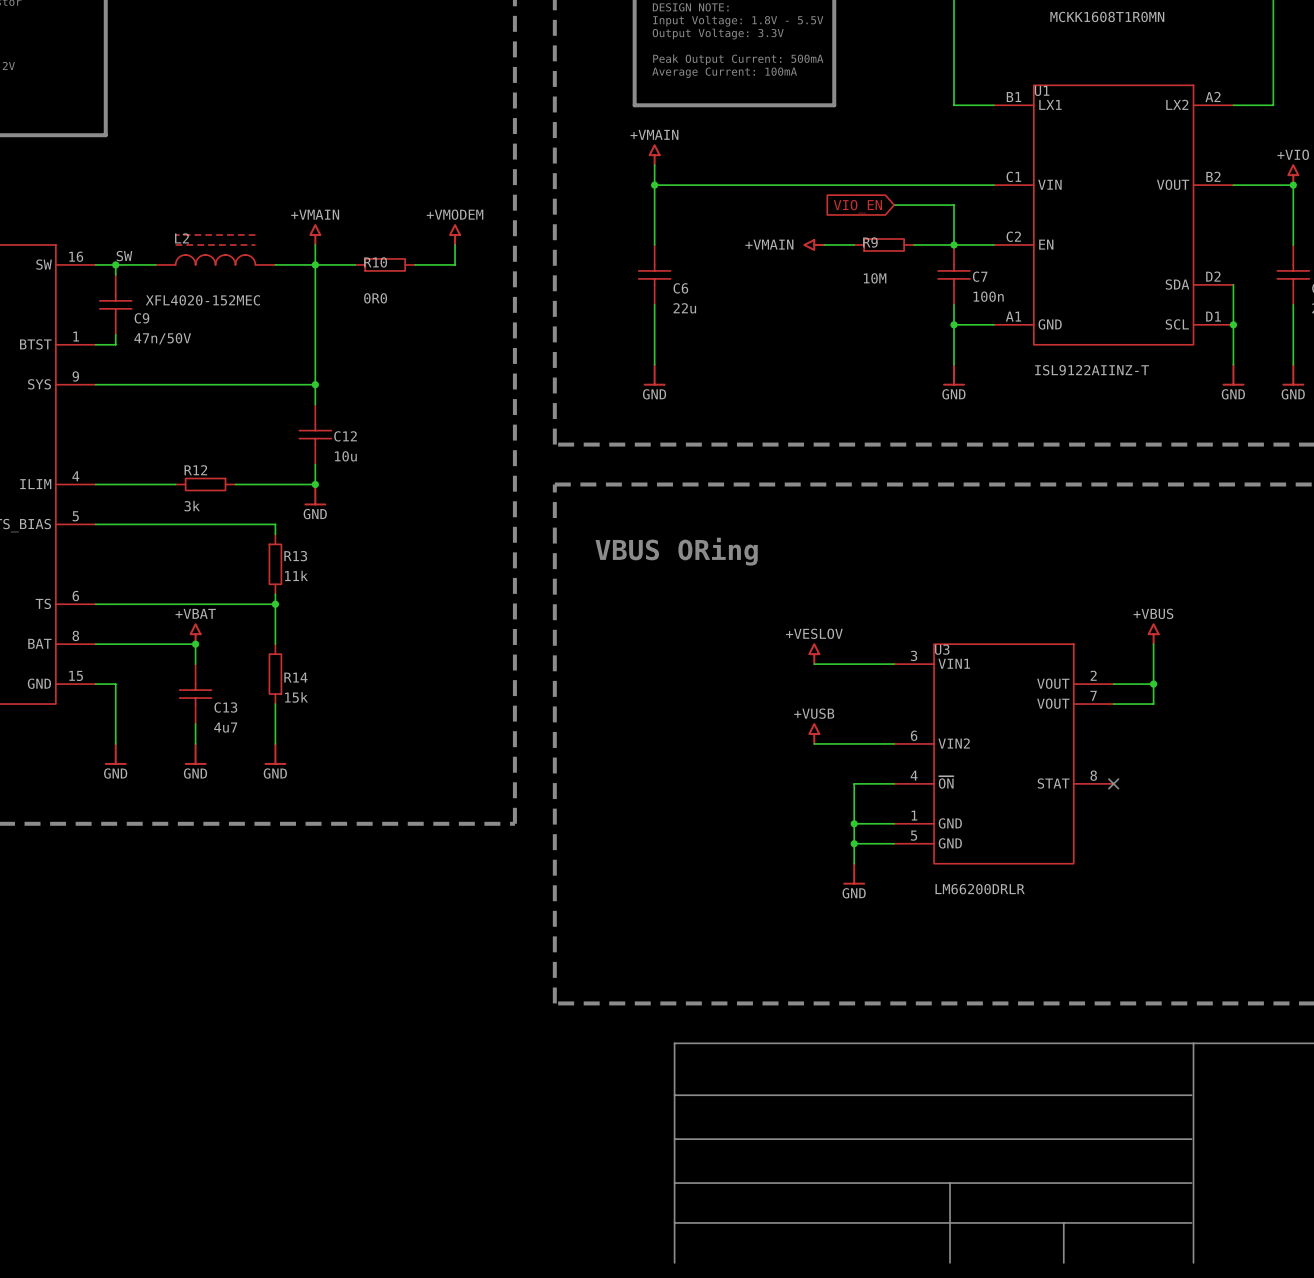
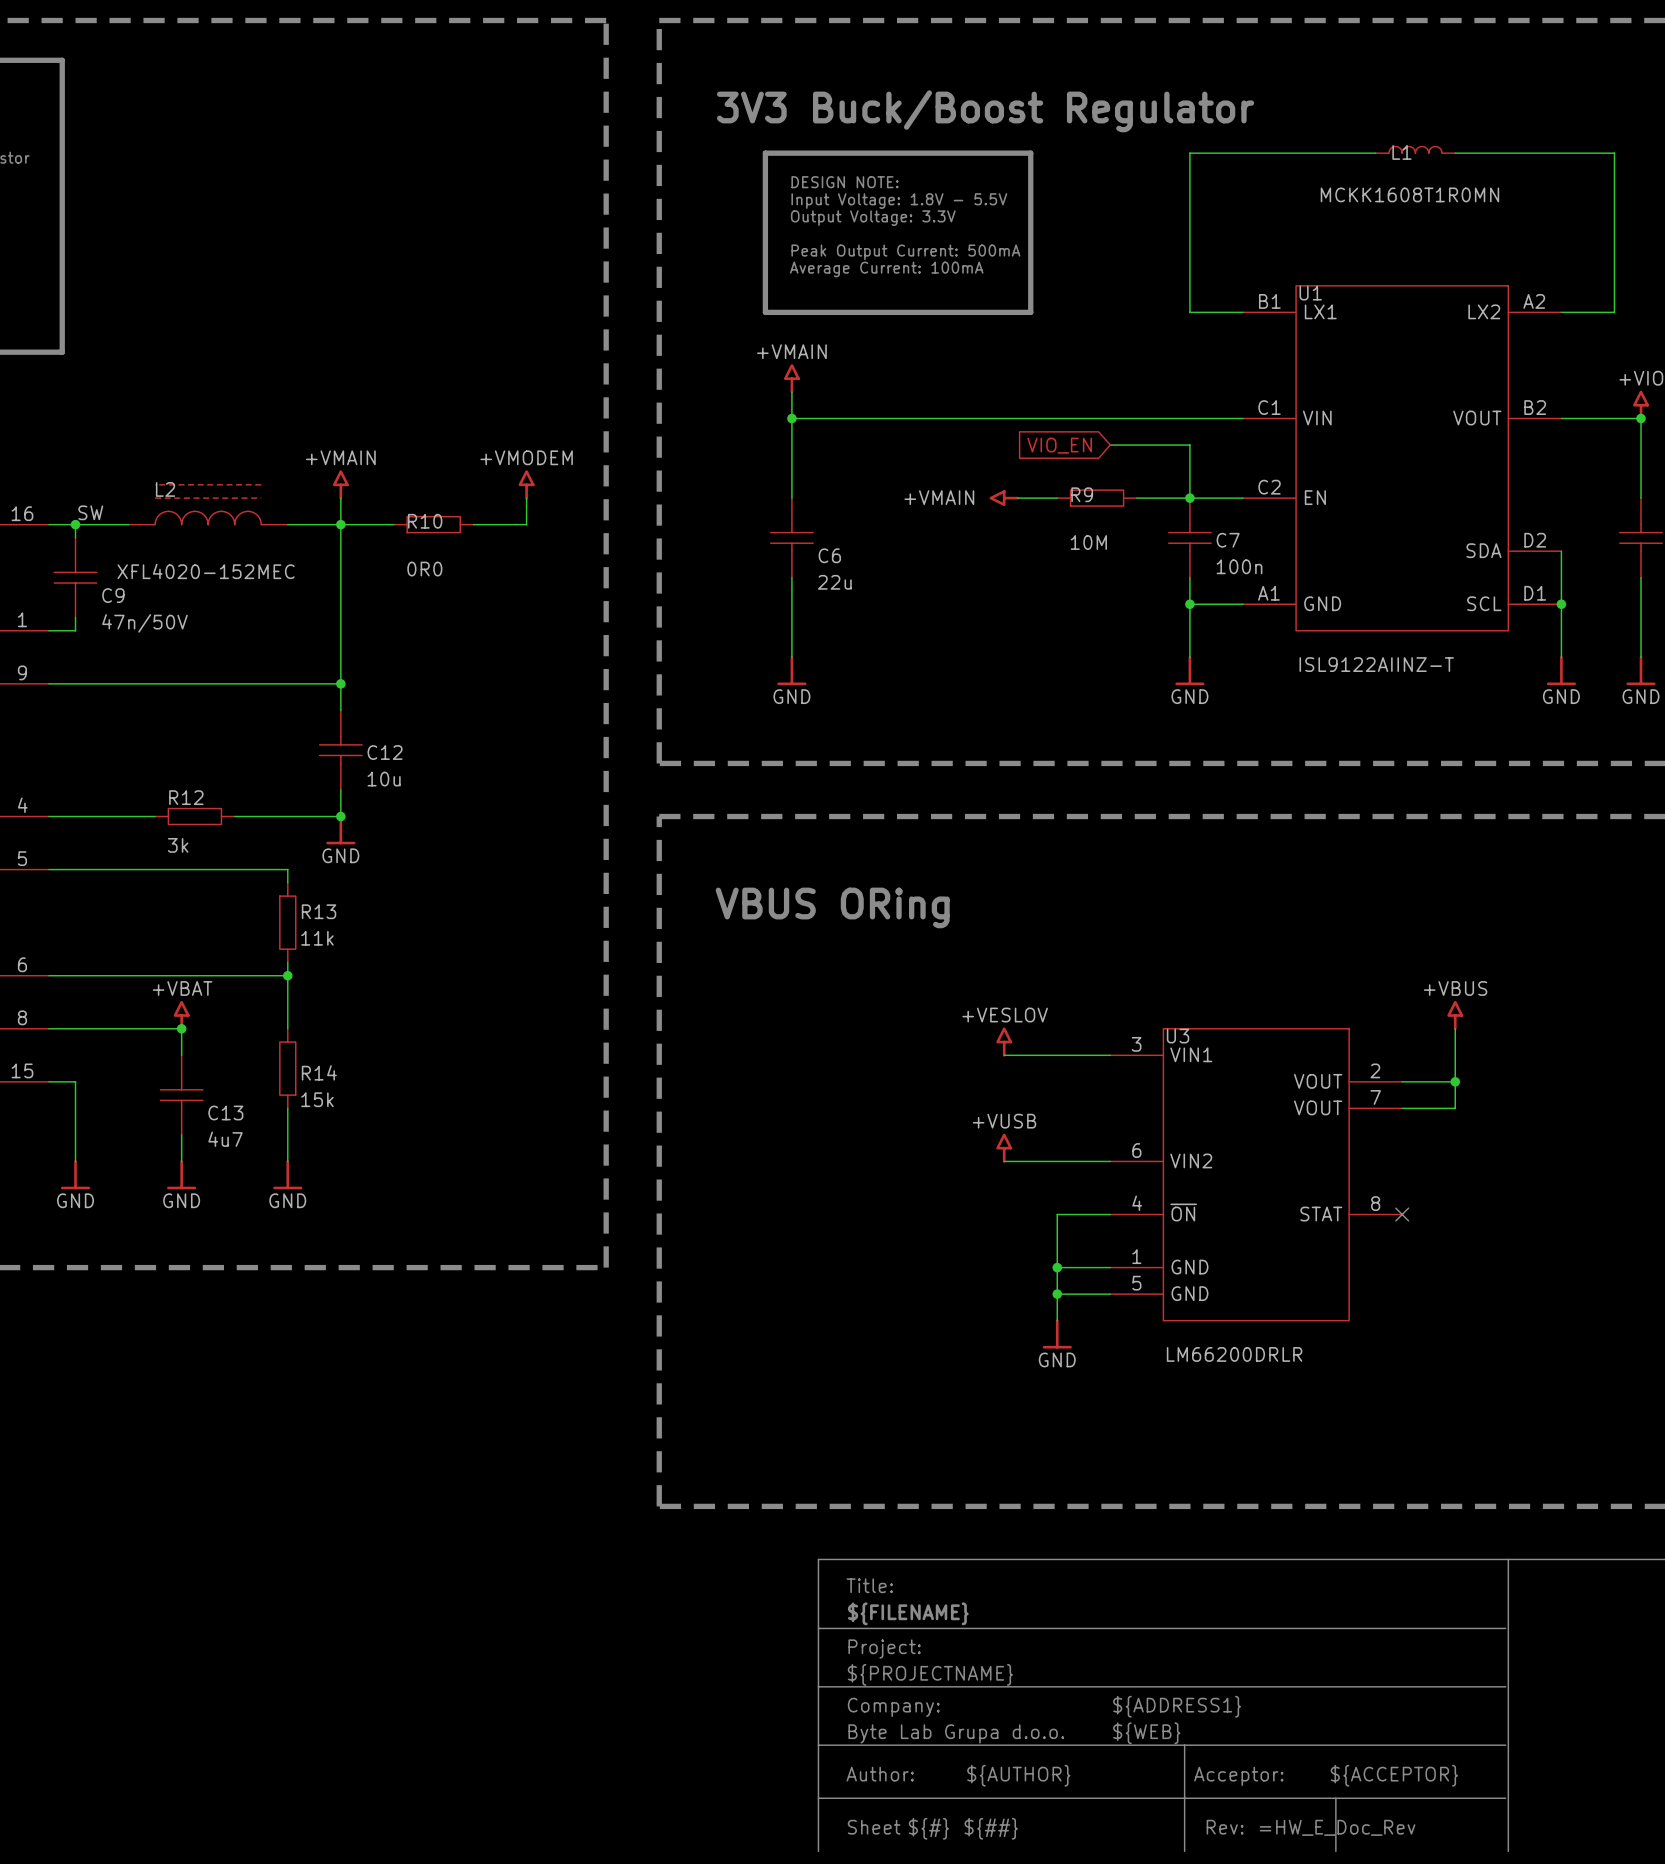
text: none -> Title: (869, 1585)
text: none -> ${FILENAME} (908, 1613)
text: none -> Project: (884, 1648)
text: none -> ${PROJECTNAME} (930, 1674)
text: none -> ${ADDRESS1} (1177, 1706)
text: none -> Company: (893, 1707)
text: none -> ${WEB} (1146, 1733)
text: none -> Byte Lab Grupa d.o.o. (956, 1733)
text: none -> Author: (880, 1774)
text: none -> ${AUTHOR} (1018, 1775)
text: none -> ${ACCEPTOR} (1394, 1775)
text: none -> Acceptor: (1238, 1776)
text: none -> Sheet (874, 1827)
text: none -> Rev: (1225, 1827)
text: none -> ${#} (928, 1828)
text: none -> ${##} (991, 1828)
text: none -> =HW_E_Doc_Rev (1337, 1827)

